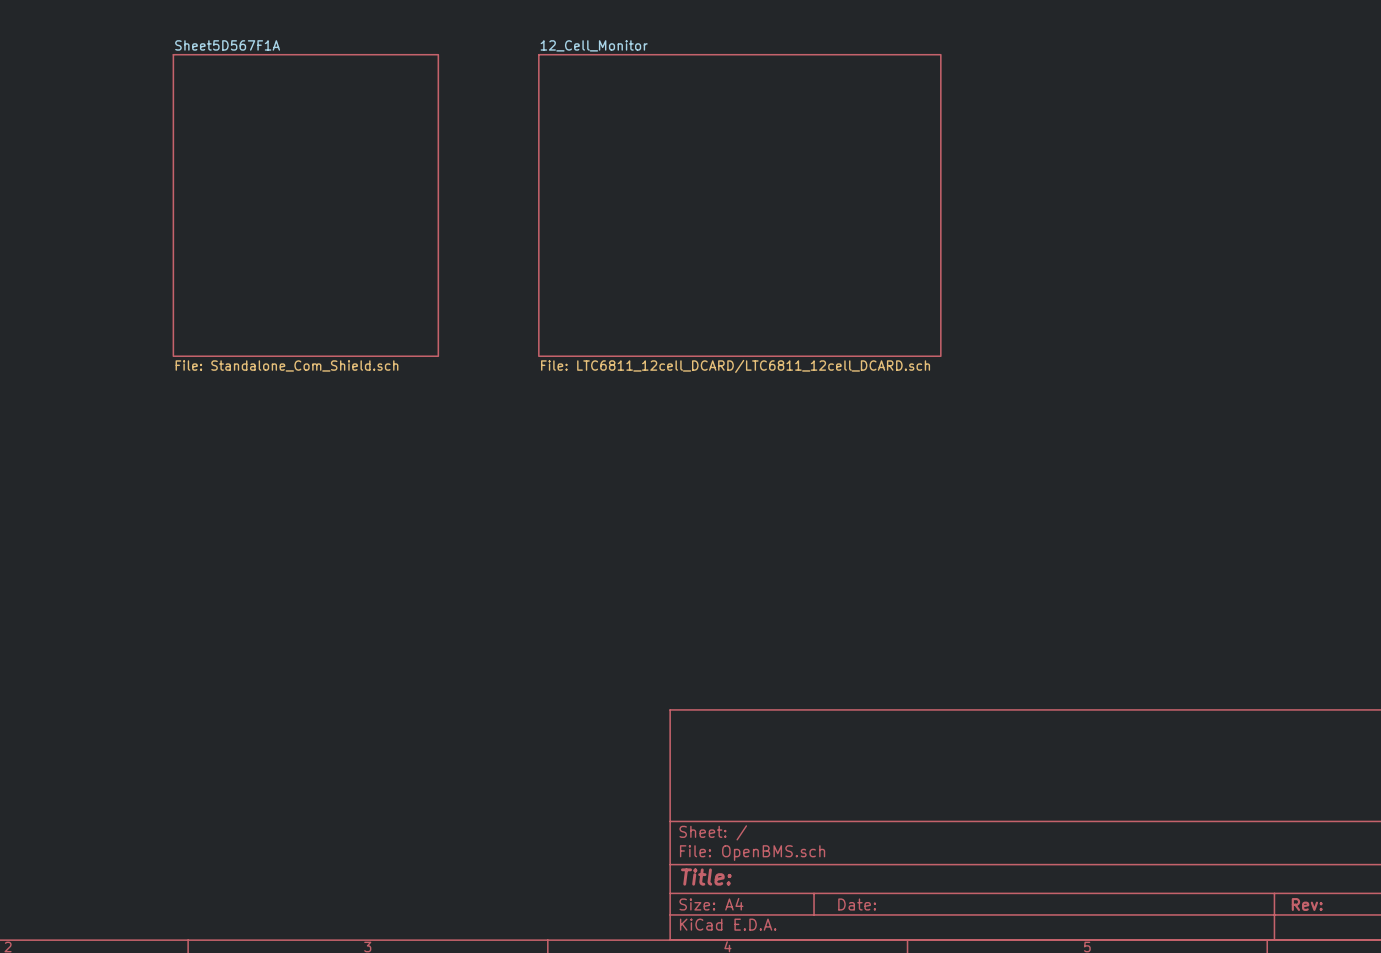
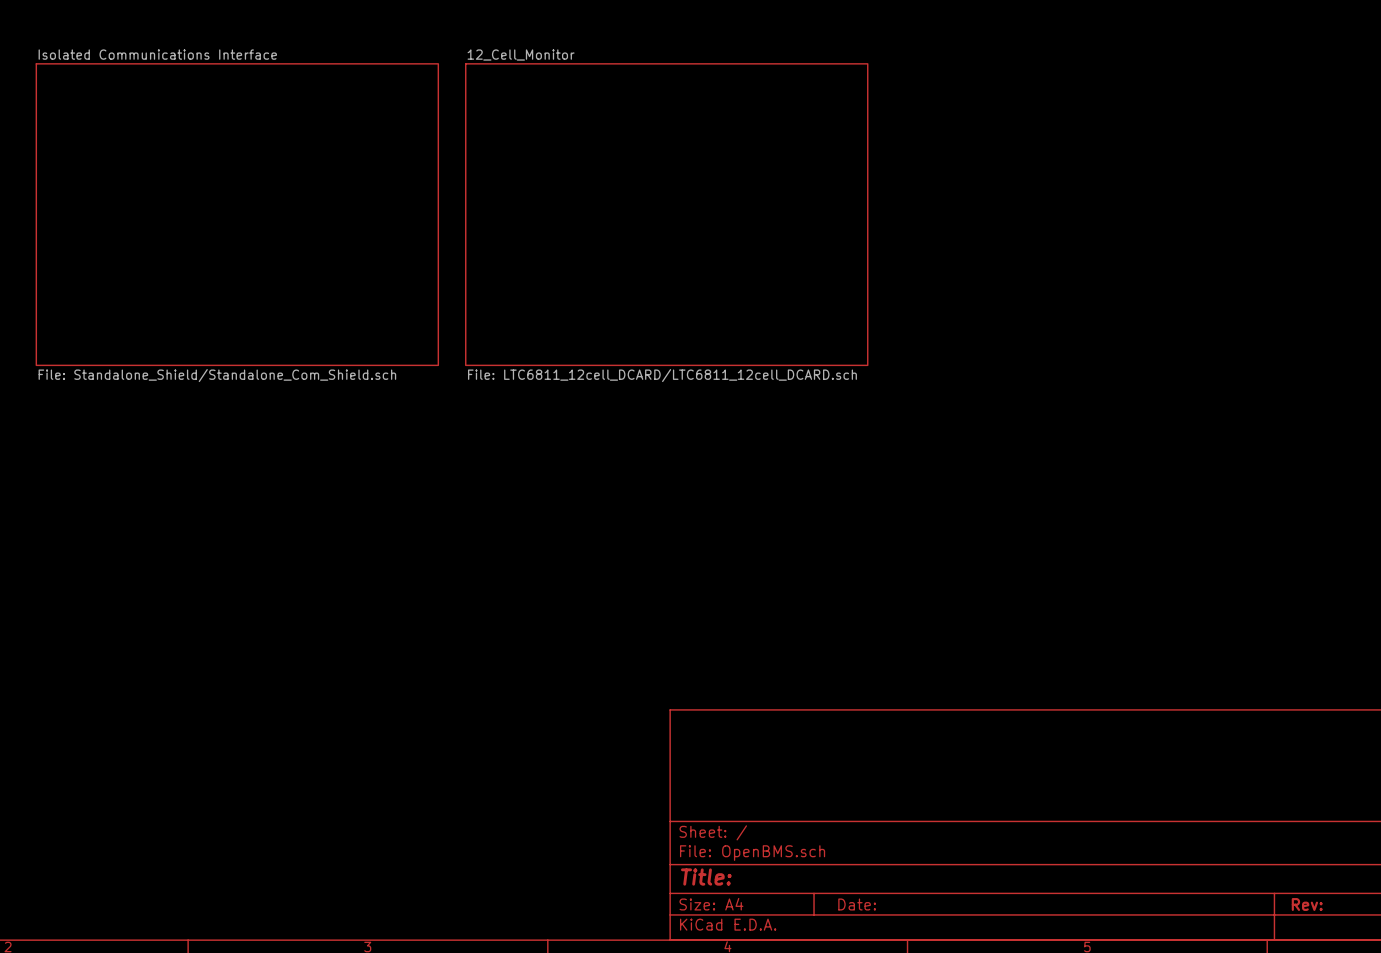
sheet Sheet5D567F1A: File: Standalone_Com_Shield.sch (305, 205) -> none
sheet 12_Cell_Monitor position: (739, 205) -> (666, 214)
sheet Isolated Communications Interface: none -> File: Standalone_Shield/Standalone_Com_Shield.sch (237, 214)

